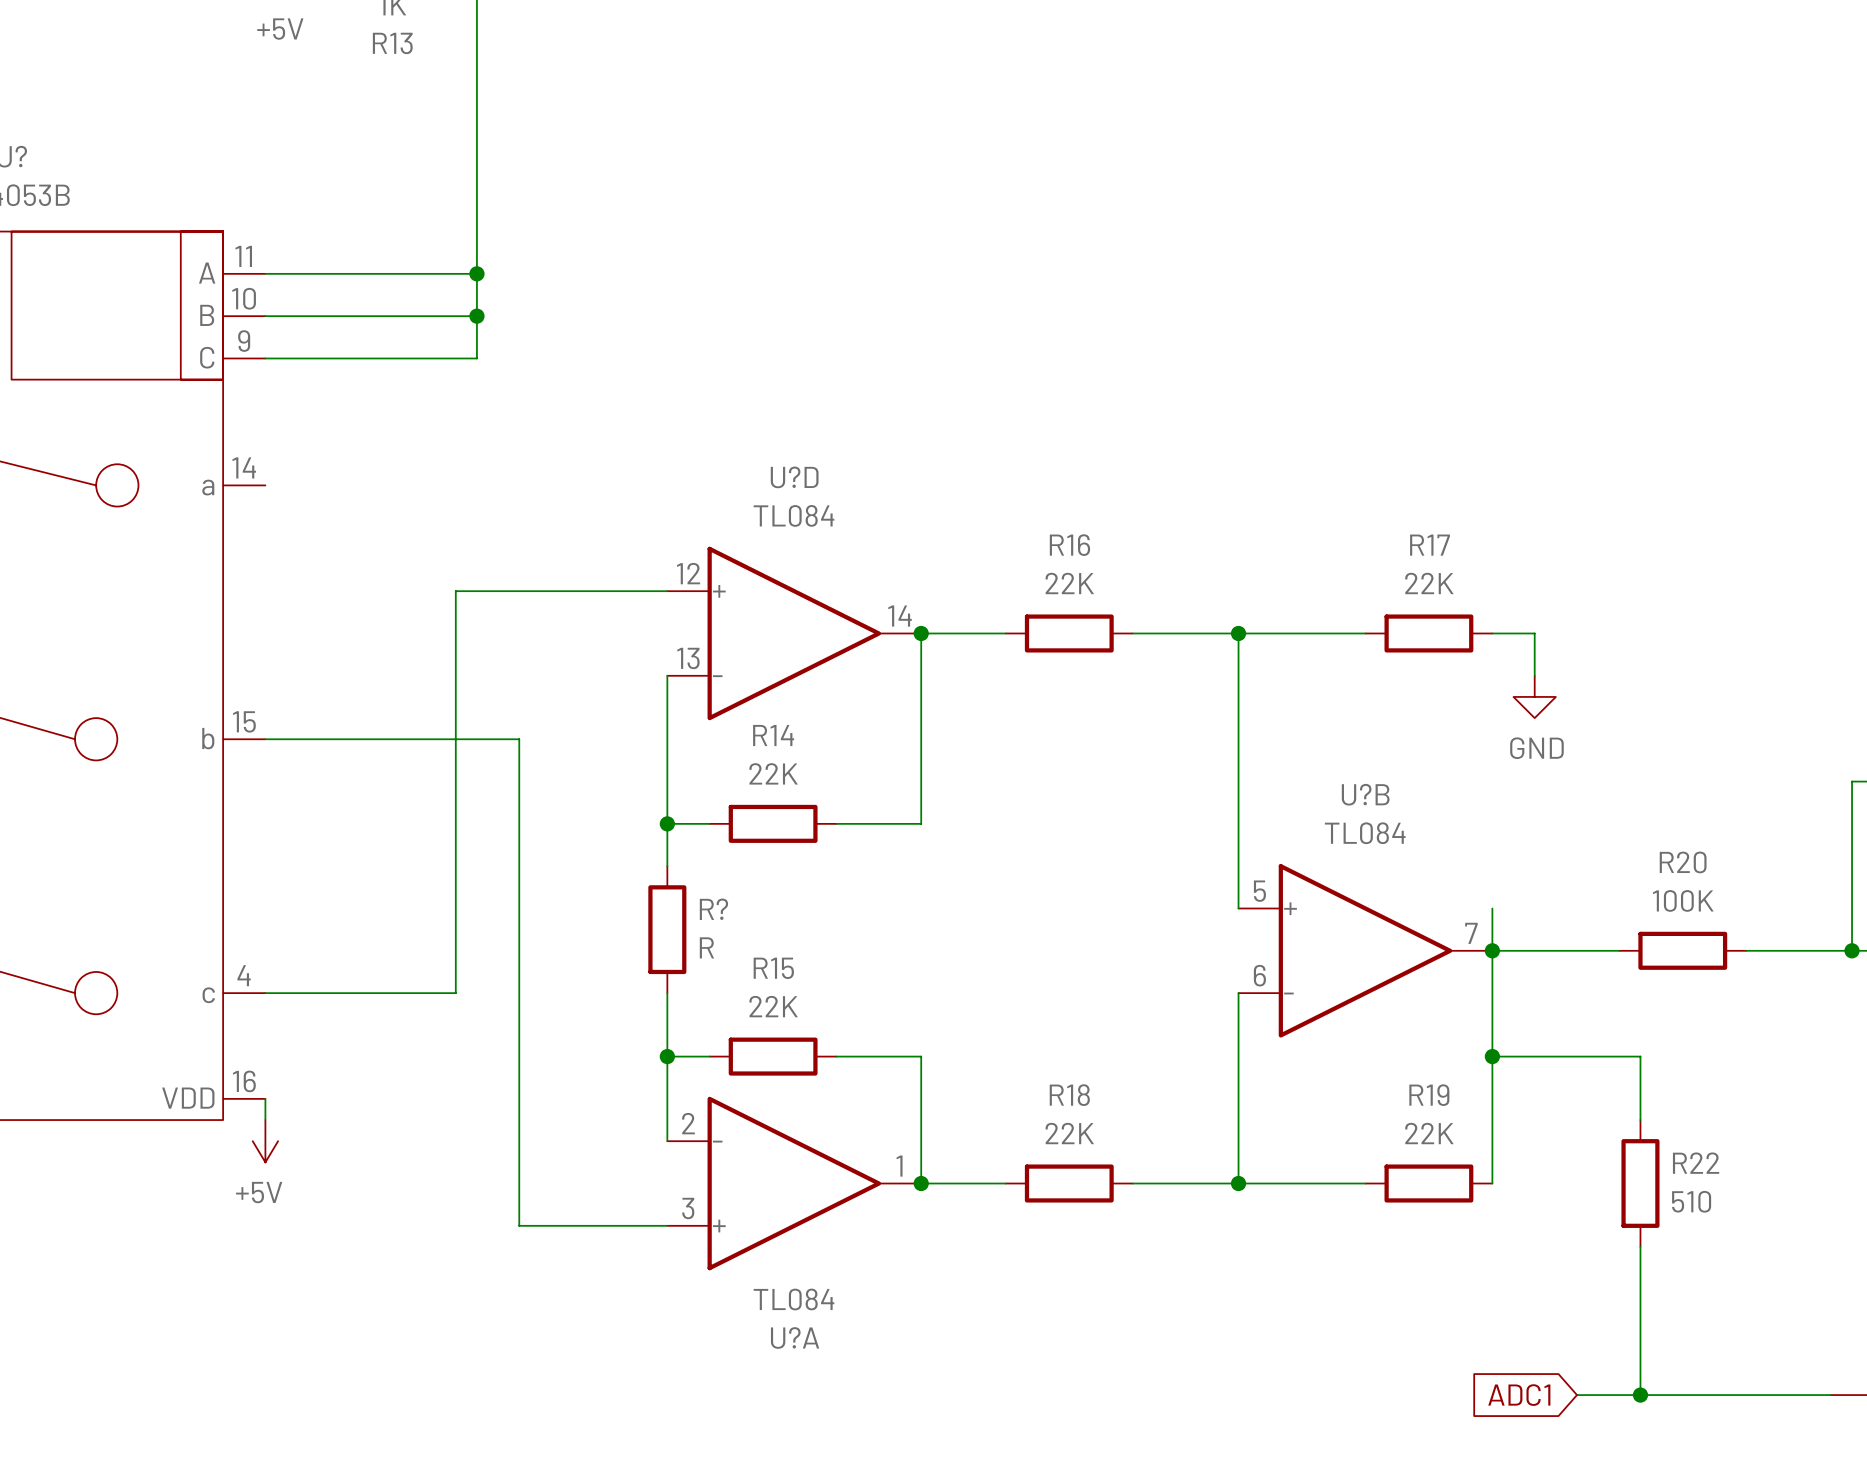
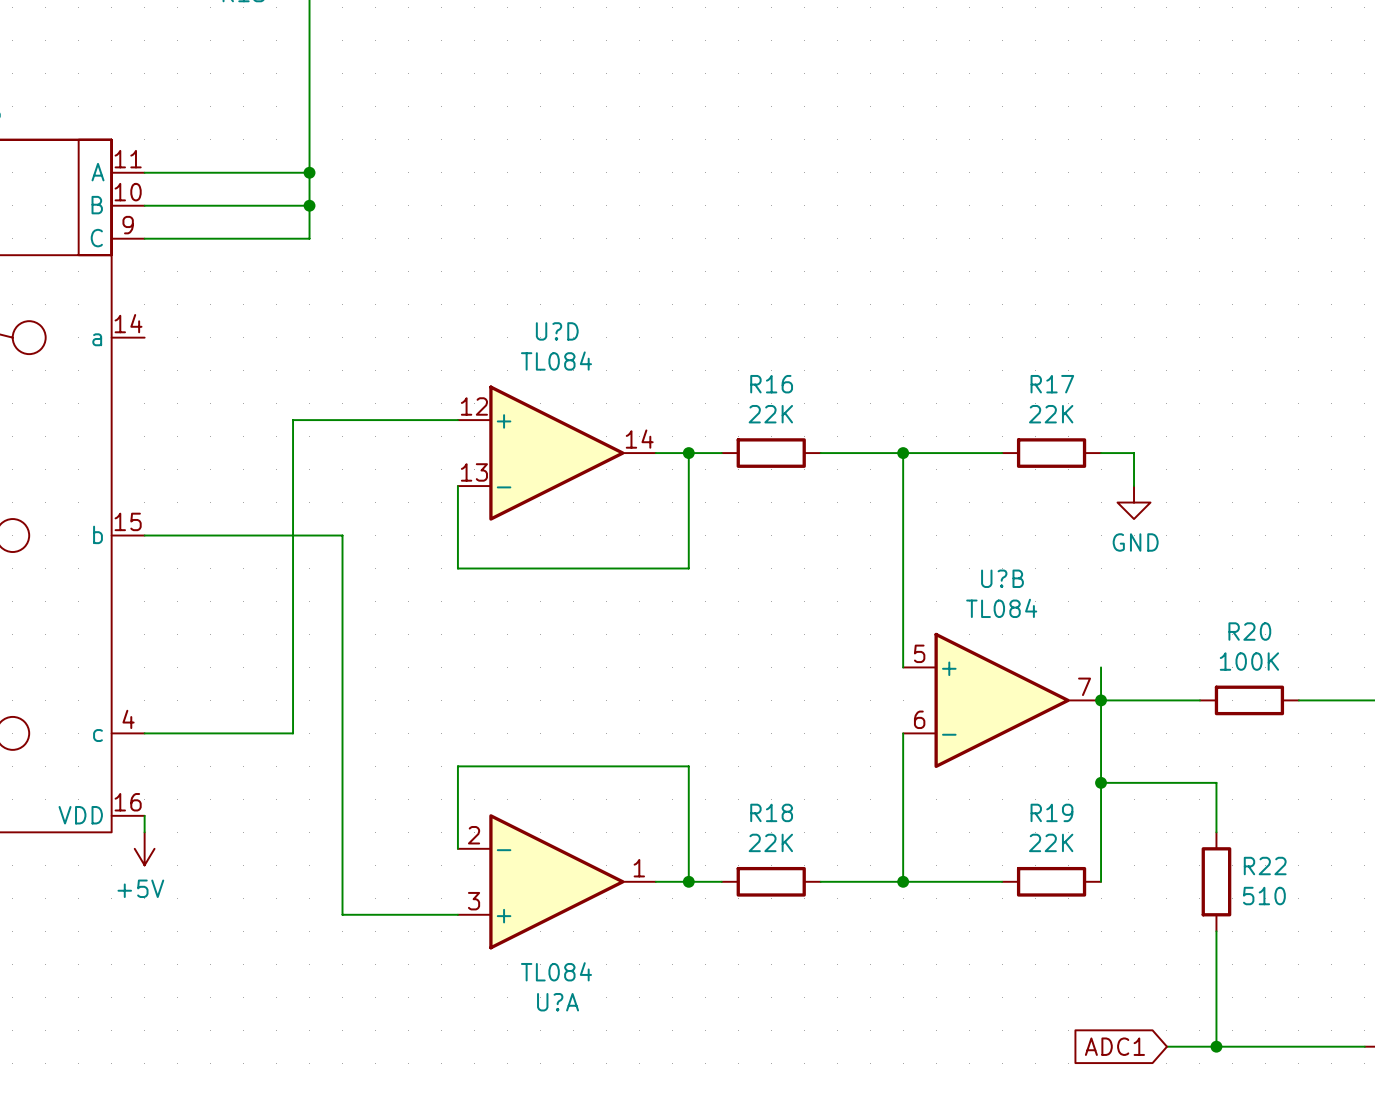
wire: (921, 633) (921, 823) (836, 823) -> none
junction position: (921, 633) -> (688, 453)
wire: (667, 781) (667, 866) -> (457, 568) (688, 568) (688, 453)
wire: (667, 823) (709, 823) -> none
junction: (667, 823) -> none
R14: 22K (773, 823) -> none
R?: R (667, 929) -> none
wire: (667, 993) (667, 1035) -> (688, 881) (688, 766) (457, 766)
wire: (667, 1056) (709, 1056) -> none
junction: (667, 1056) -> none
R15: 22K (773, 1056) -> none
wire: (836, 1056) (921, 1056) (921, 1183) -> none
junction position: (921, 1183) -> (688, 881)

